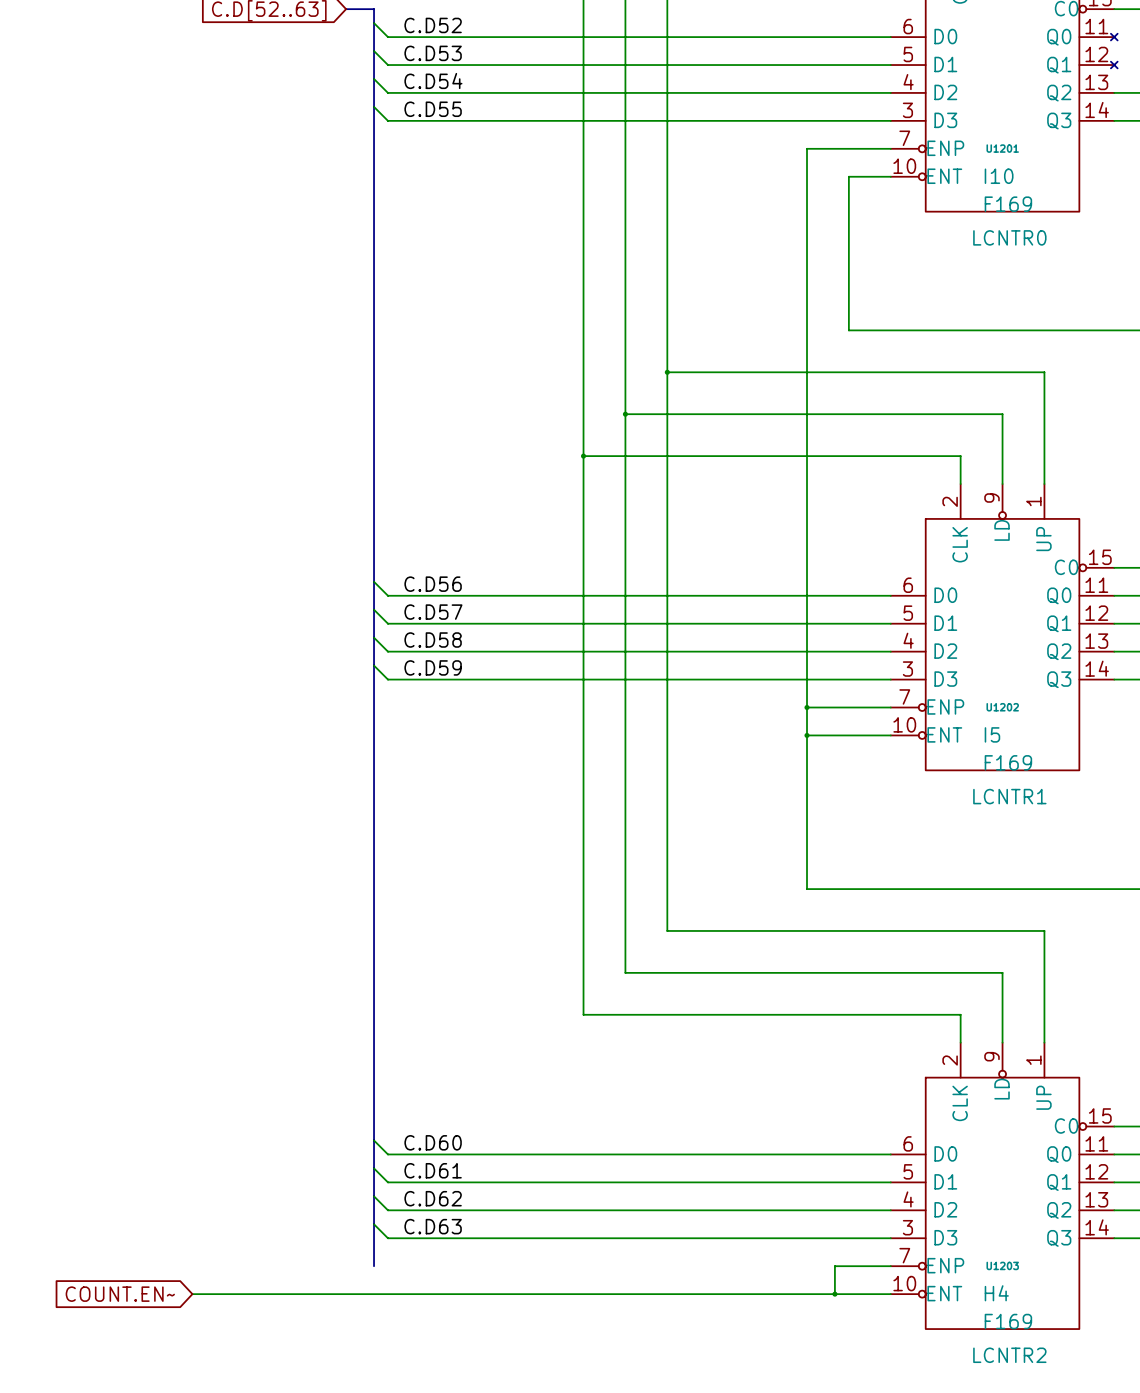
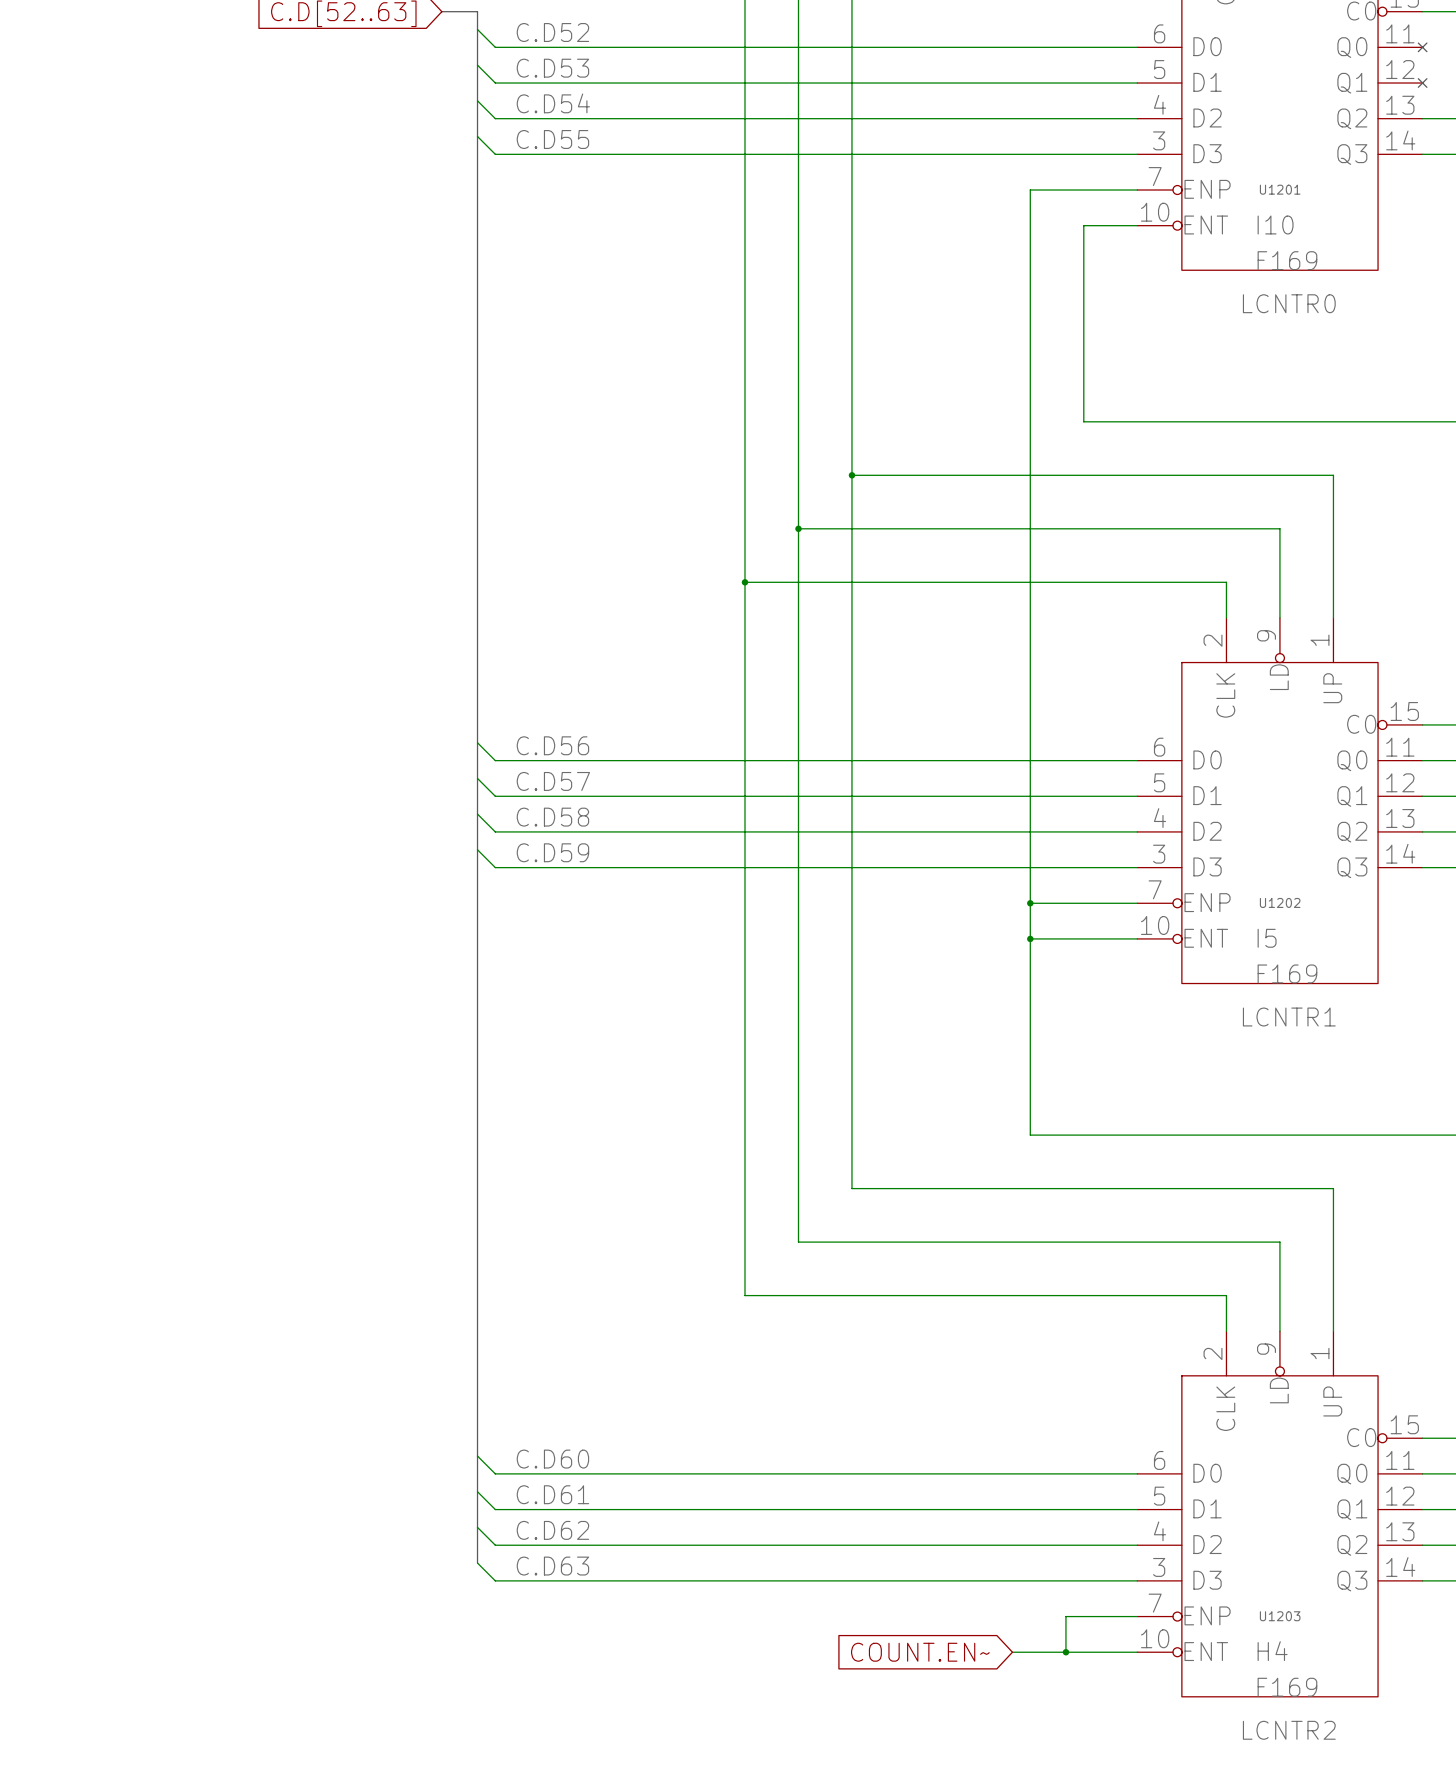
bus: (374, 1224) (374, 1266) -> none
global label: COUNT.EN~ (120, 1294) -> none
wire: (192, 1294) (793, 1294) -> none
global label: none -> COUNT.EN~ (920, 1652)

